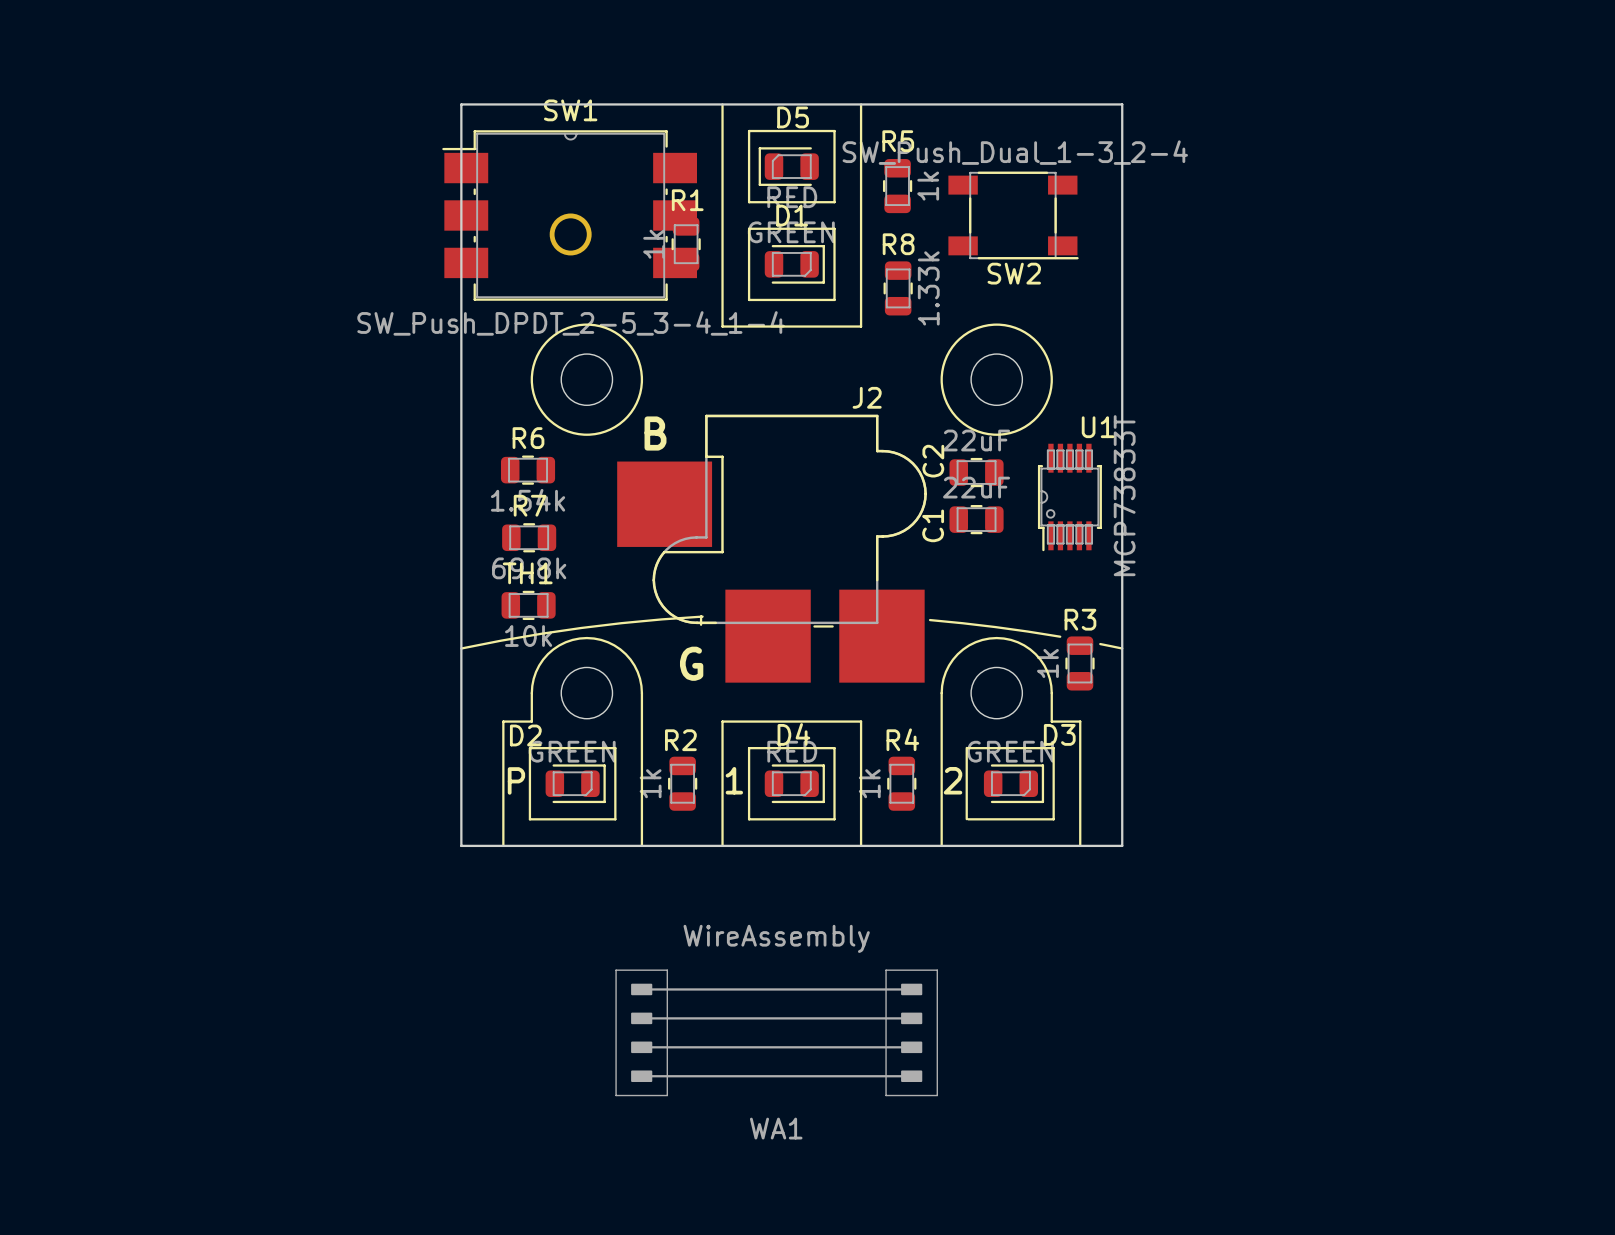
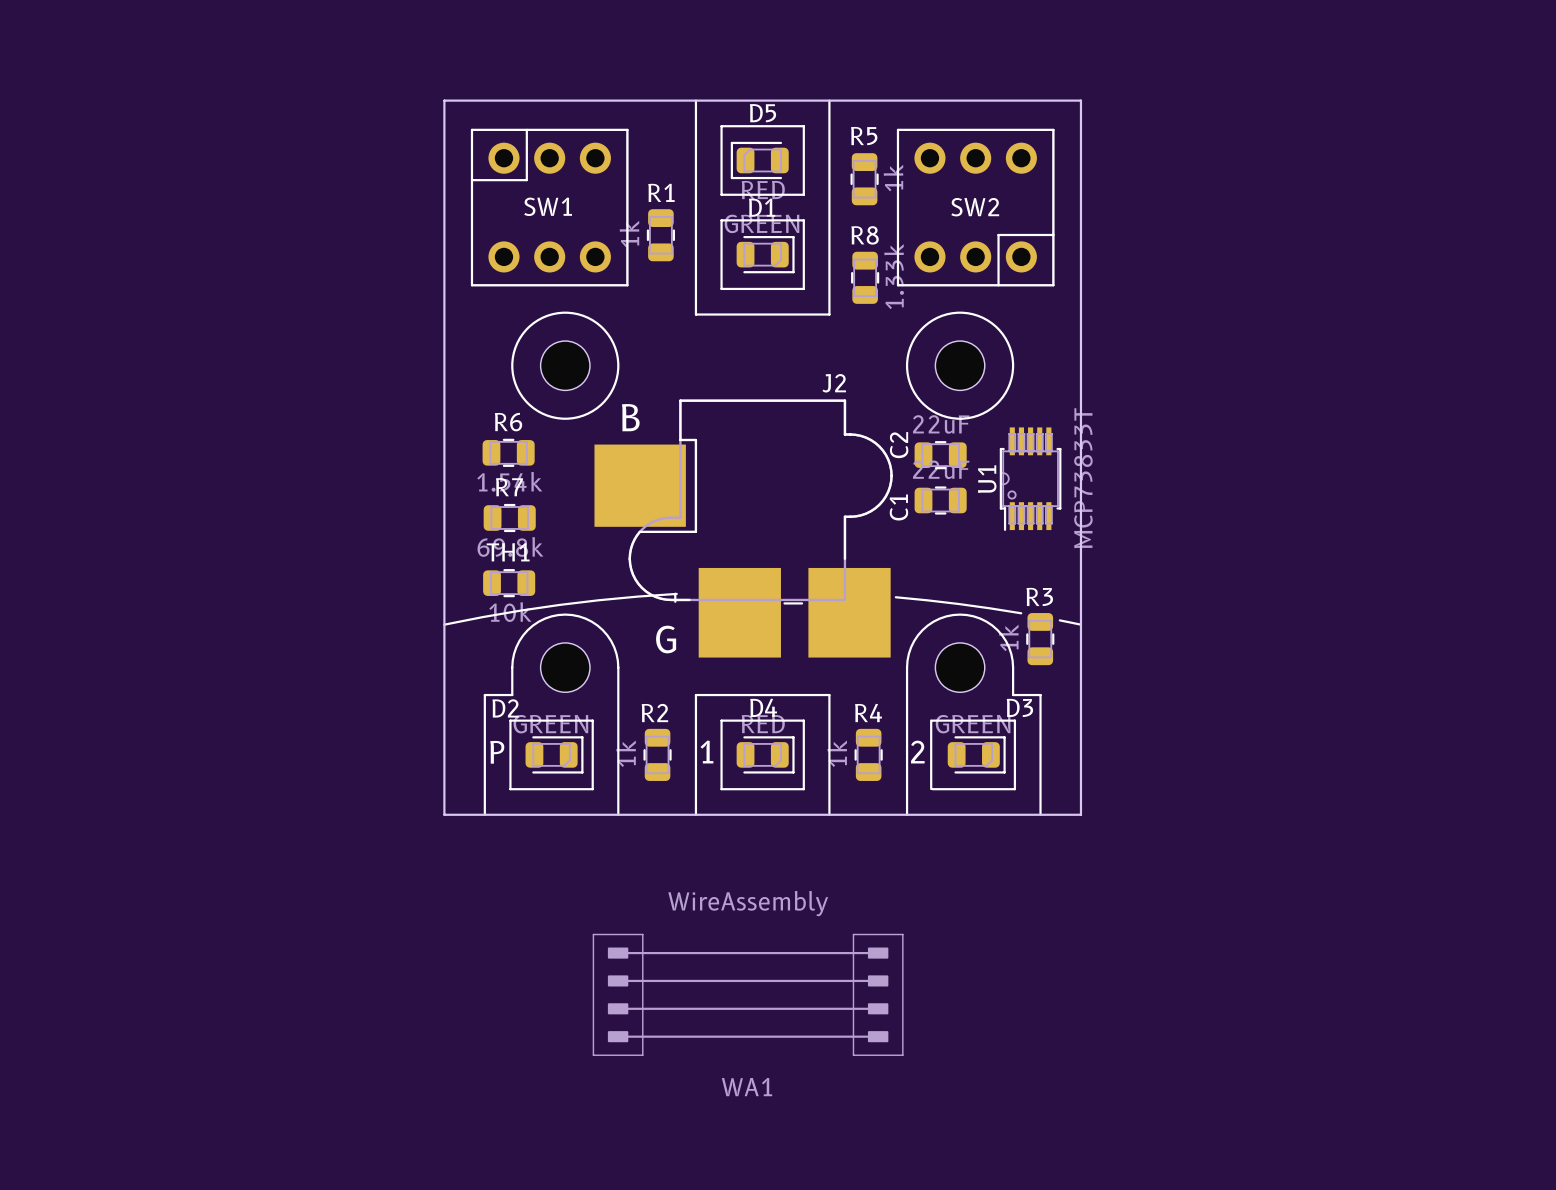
SW1 name position: SW1 (570, 110) -> SW1 (548, 206)
SW1 footprint: [442, 130, 698, 301] -> [470, 128, 629, 287]
SW2 value: SW_Push_Dual_1-3_2-4 (1015, 152) -> none
SW2 footprint: [948, 171, 1079, 260] -> [896, 128, 1055, 287]
SW2 name position: SW2 (1014, 273) -> SW2 (975, 207)
SW1 value: SW_Push_DPDT_2-5_3-4_1-4 (571, 323) -> none
U1 name rotation: 0° (1098, 427) -> 90° counterclockwise (987, 479)
U1 name position: U1 (1098, 427) -> U1 (987, 479)

